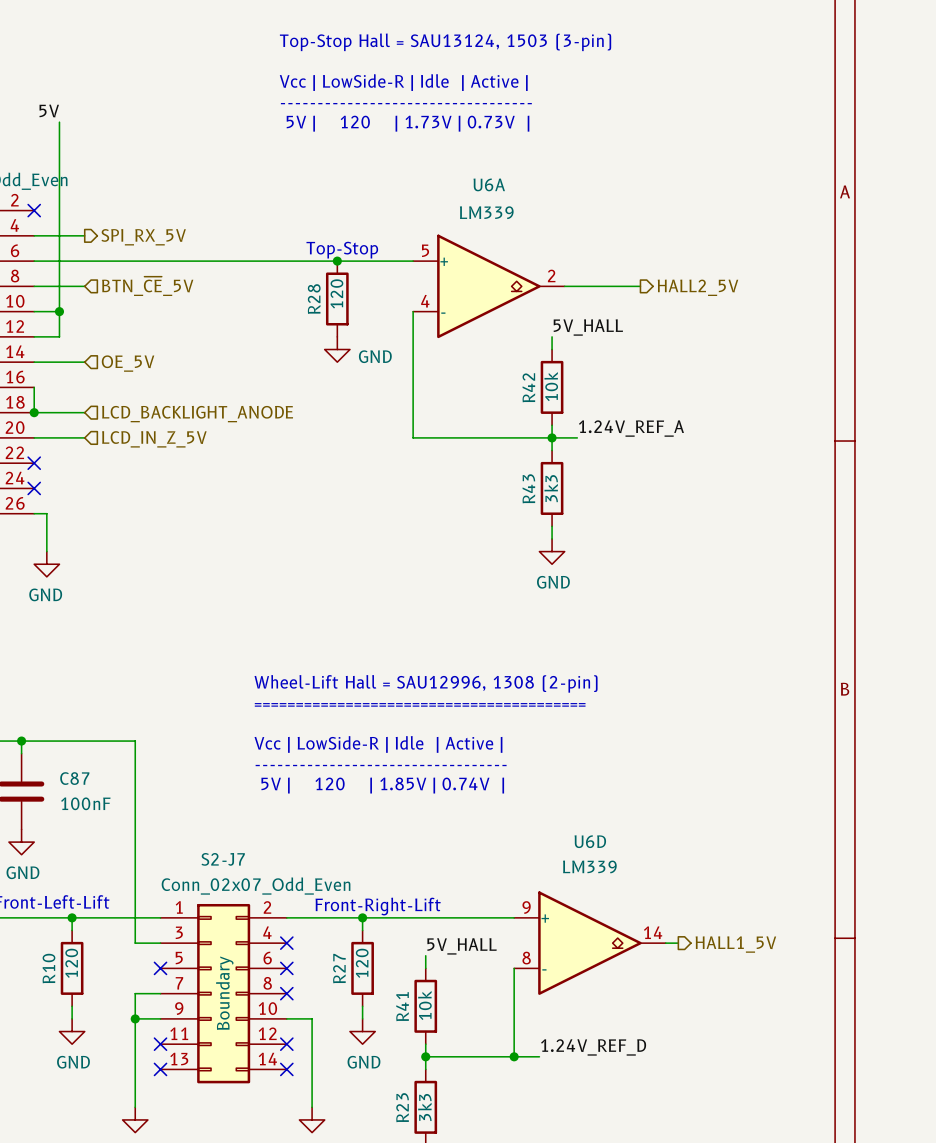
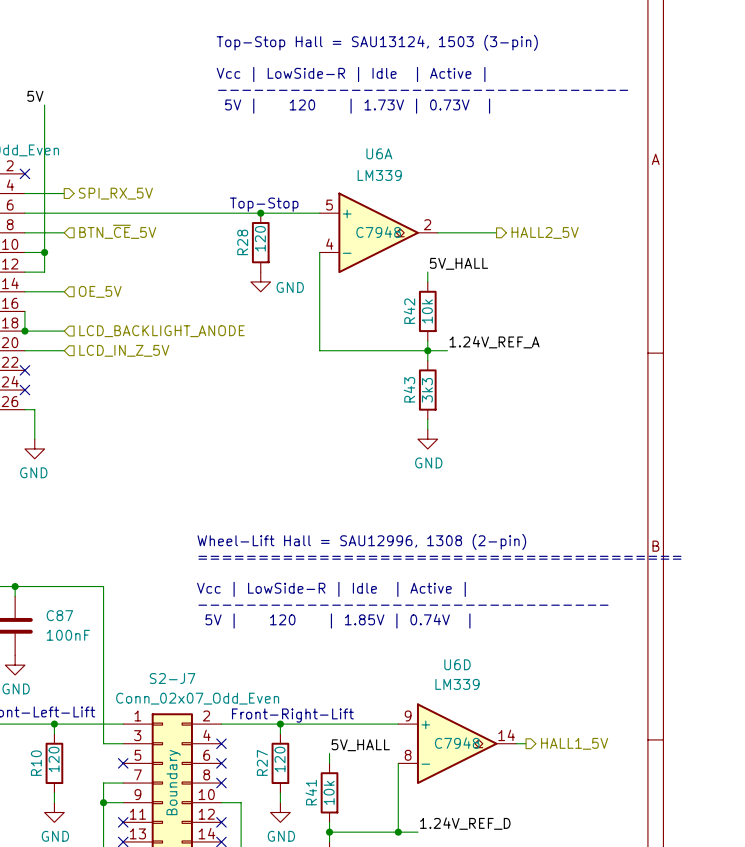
U6A text: none -> C7948 (378, 232)
U6D text: none -> C7948 (457, 743)

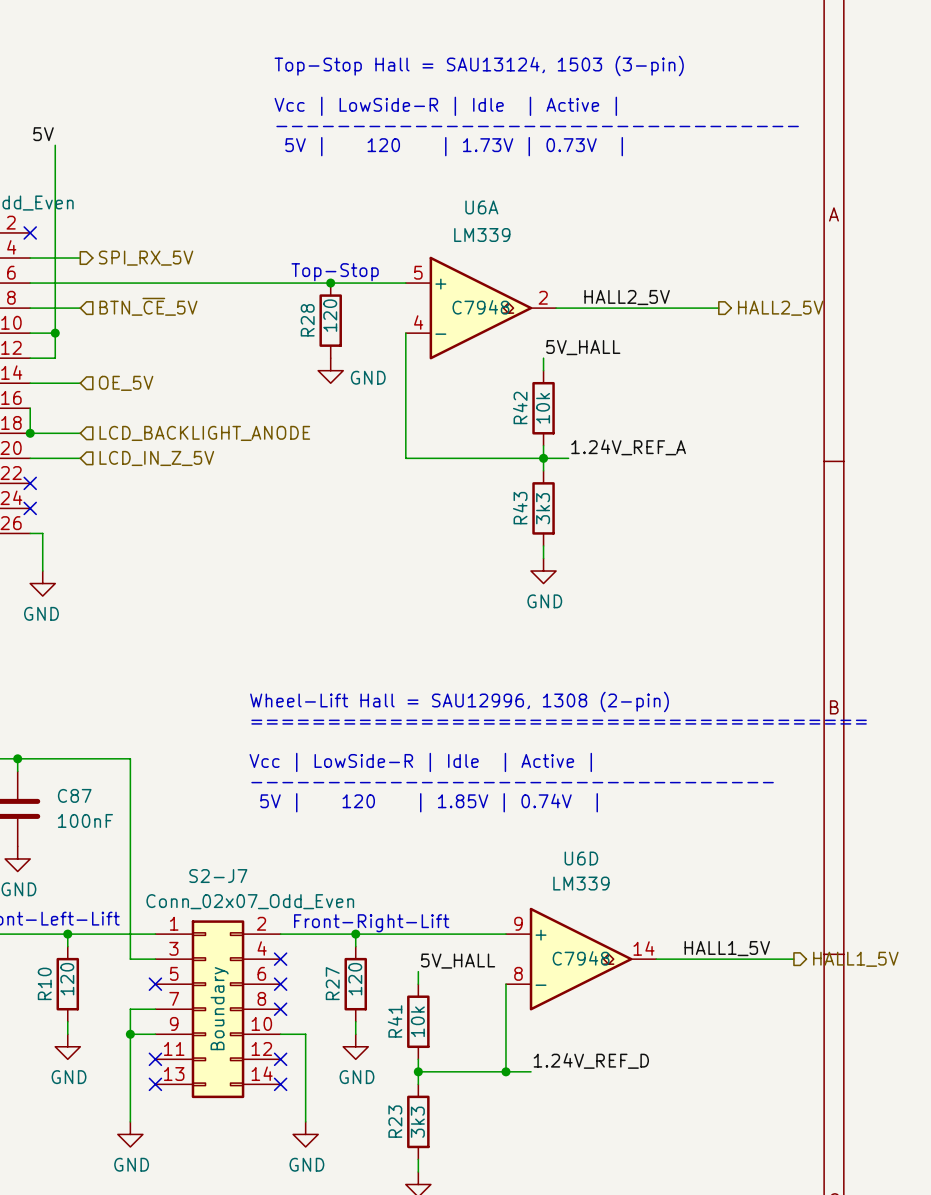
label: none -> HALL2_5V (627, 297)
wire: none -> (631, 308) (718, 308)
hierarchical label position: HALL2_5V (545, 232) -> HALL2_5V (780, 308)
label: none -> HALL1_5V (727, 948)
wire: none -> (668, 959) (793, 959)
hierarchical label position: HALL1_5V (574, 743) -> HALL1_5V (855, 959)

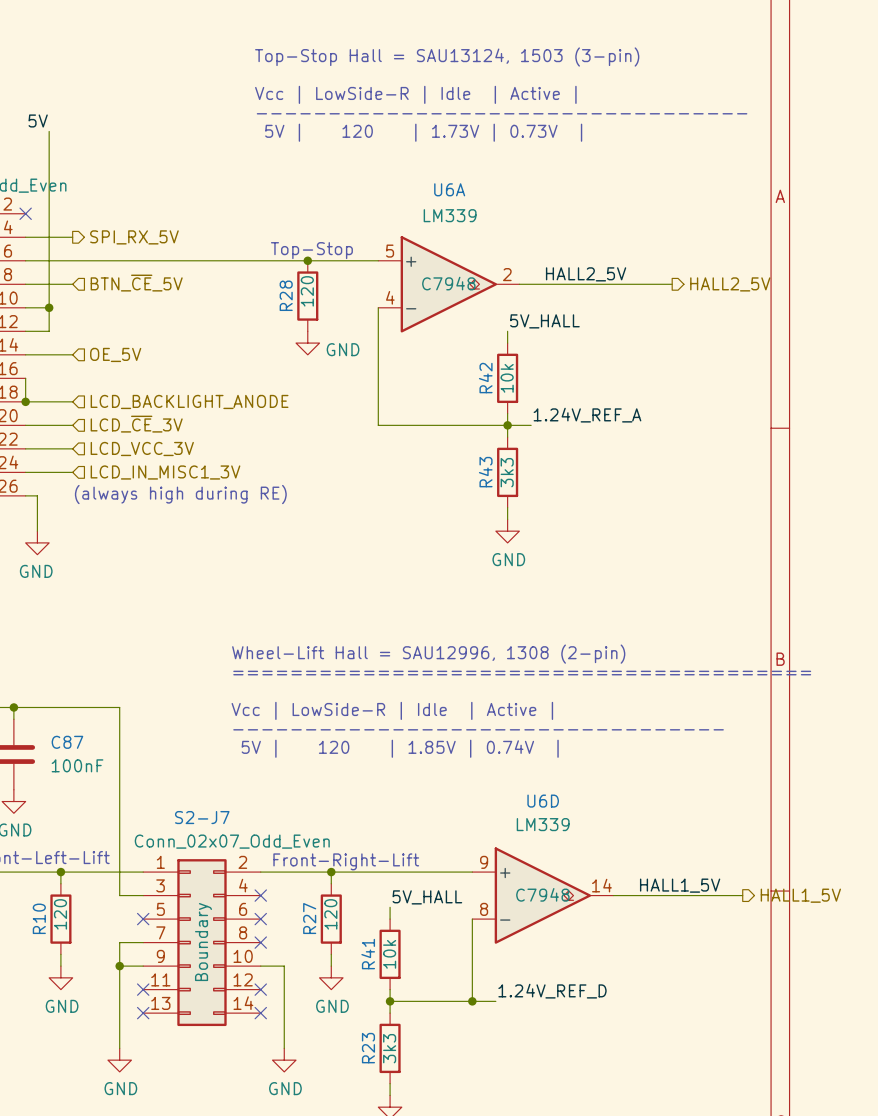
hierarchical label: LCD_IN_Z_5V (156, 458) -> LCD_~{CE}_3V (136, 424)
wire: none -> (25, 448) (72, 448)
no-connect mark: (30, 483) -> none
hierarchical label: none -> LCD_VCC_3V (142, 448)
wire: none -> (25, 472) (72, 472)
no-connect mark: (30, 508) -> none
hierarchical label: none -> LCD_IN_MISC1_3V (165, 472)
text: none -> (always high during RE) (180, 494)

